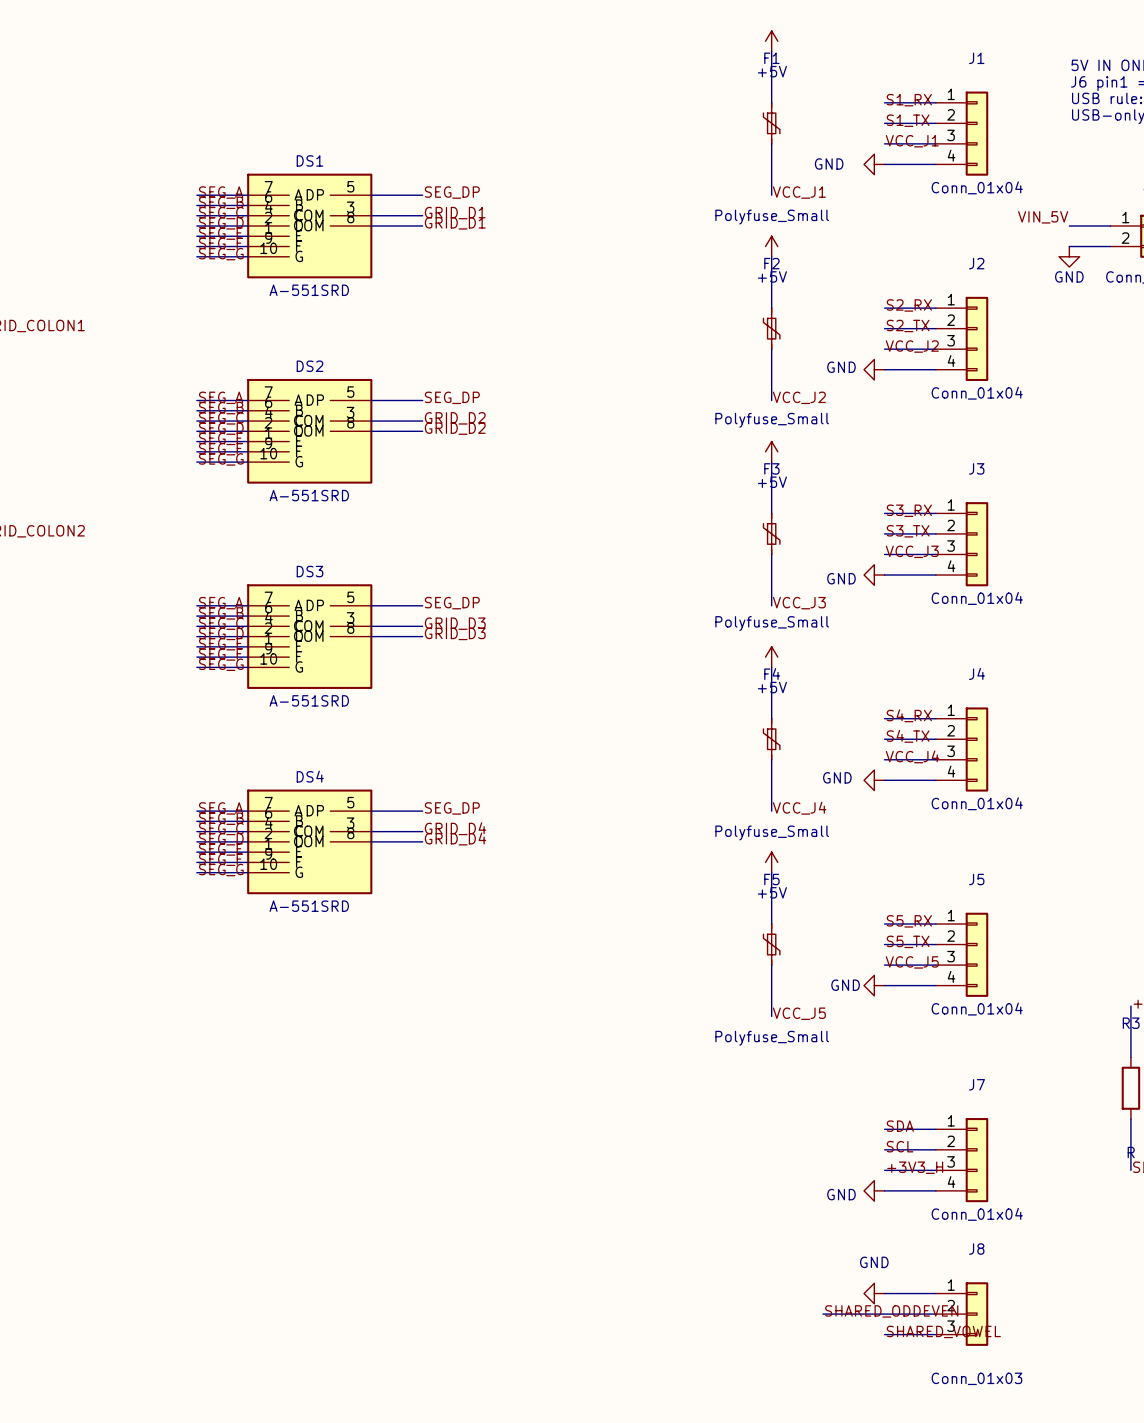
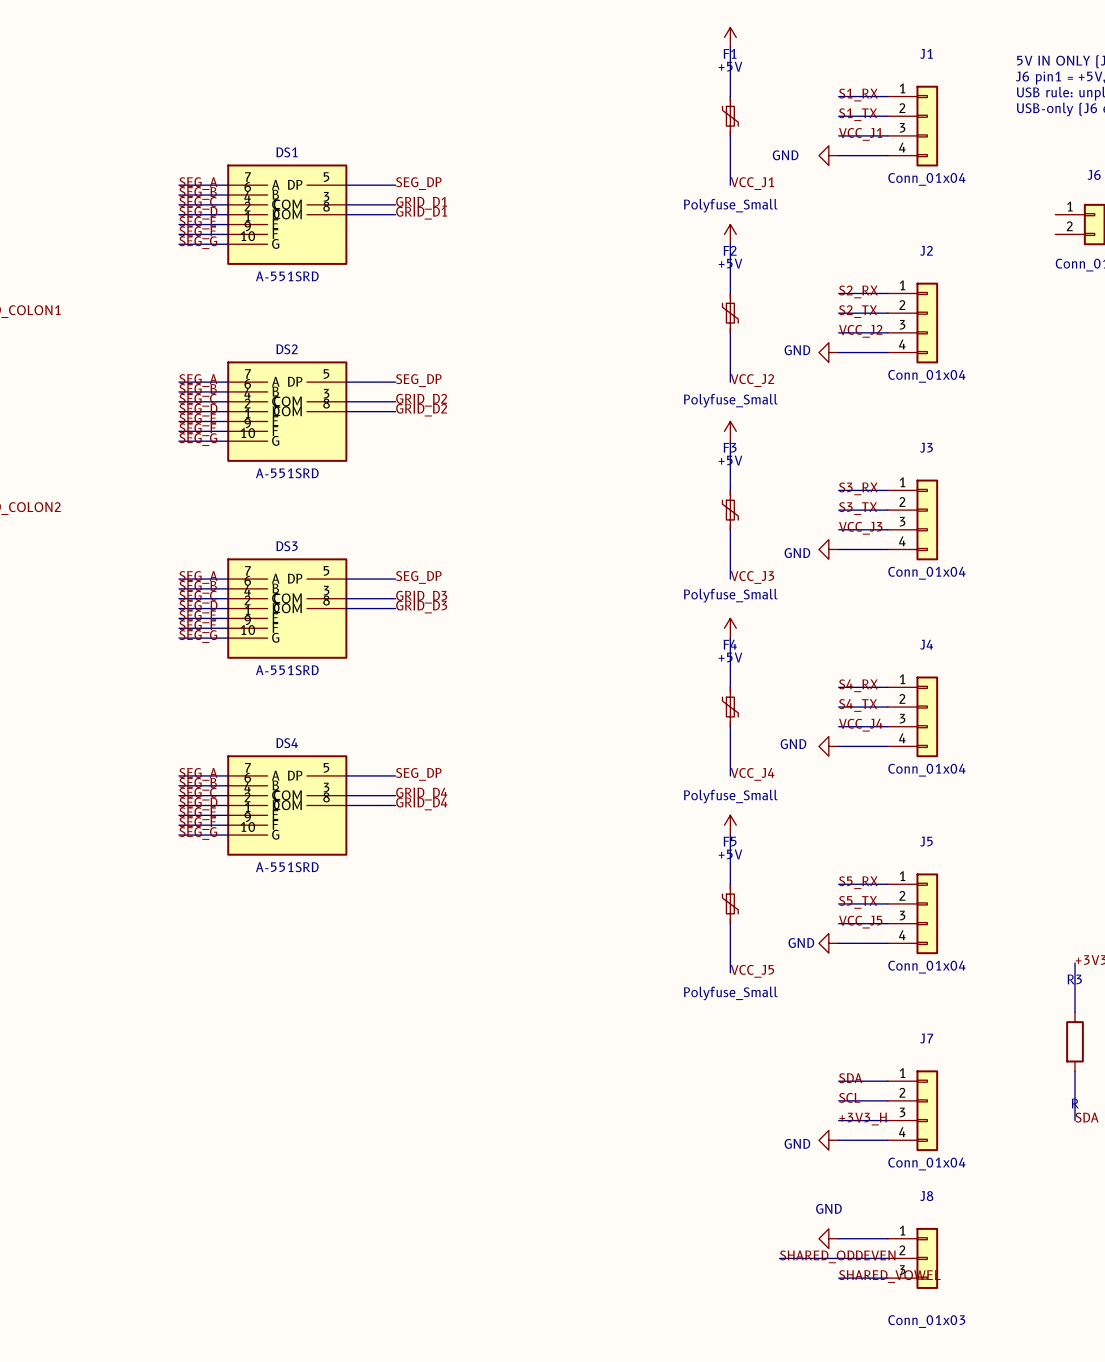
label: VIN_5V (1043, 217) -> none
wire: (1069, 226) (1110, 226) -> none
wire: (1069, 246) (1110, 246) -> none
power symbol: GND (1069, 256) -> none

